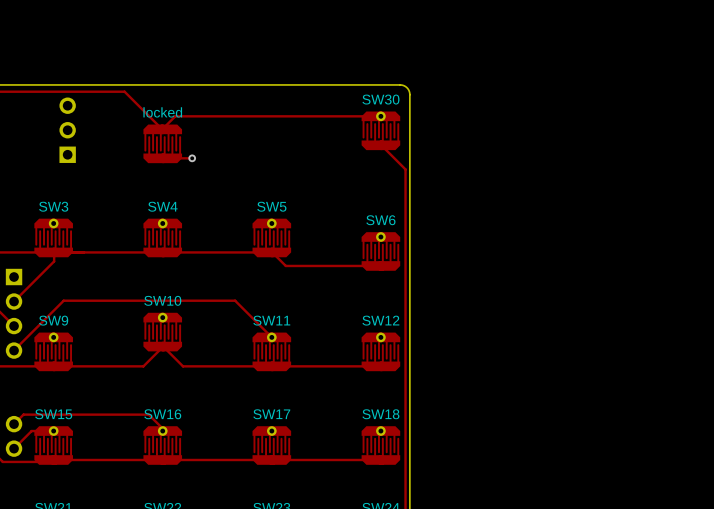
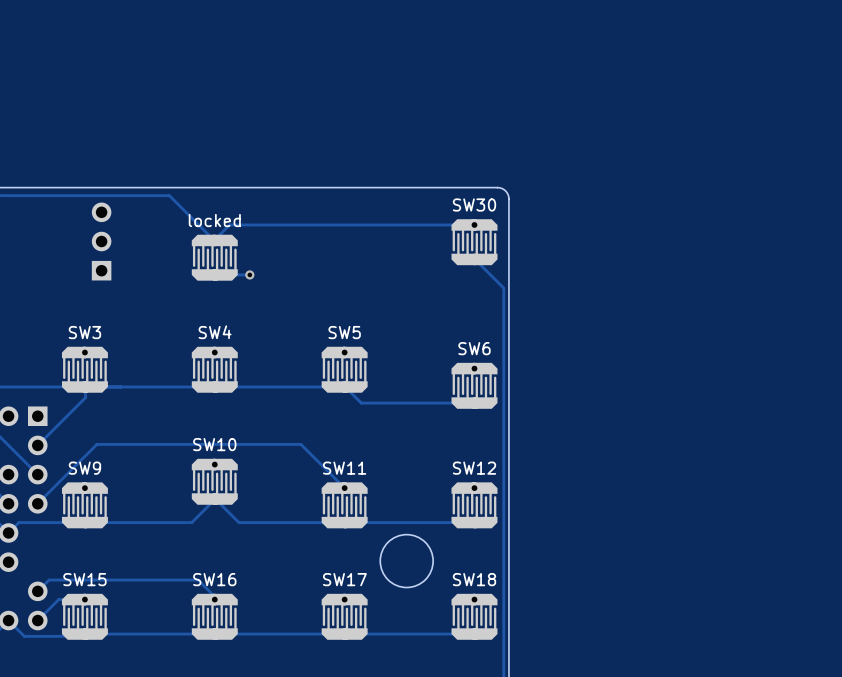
round board edge: none -> [379, 534, 434, 589]

